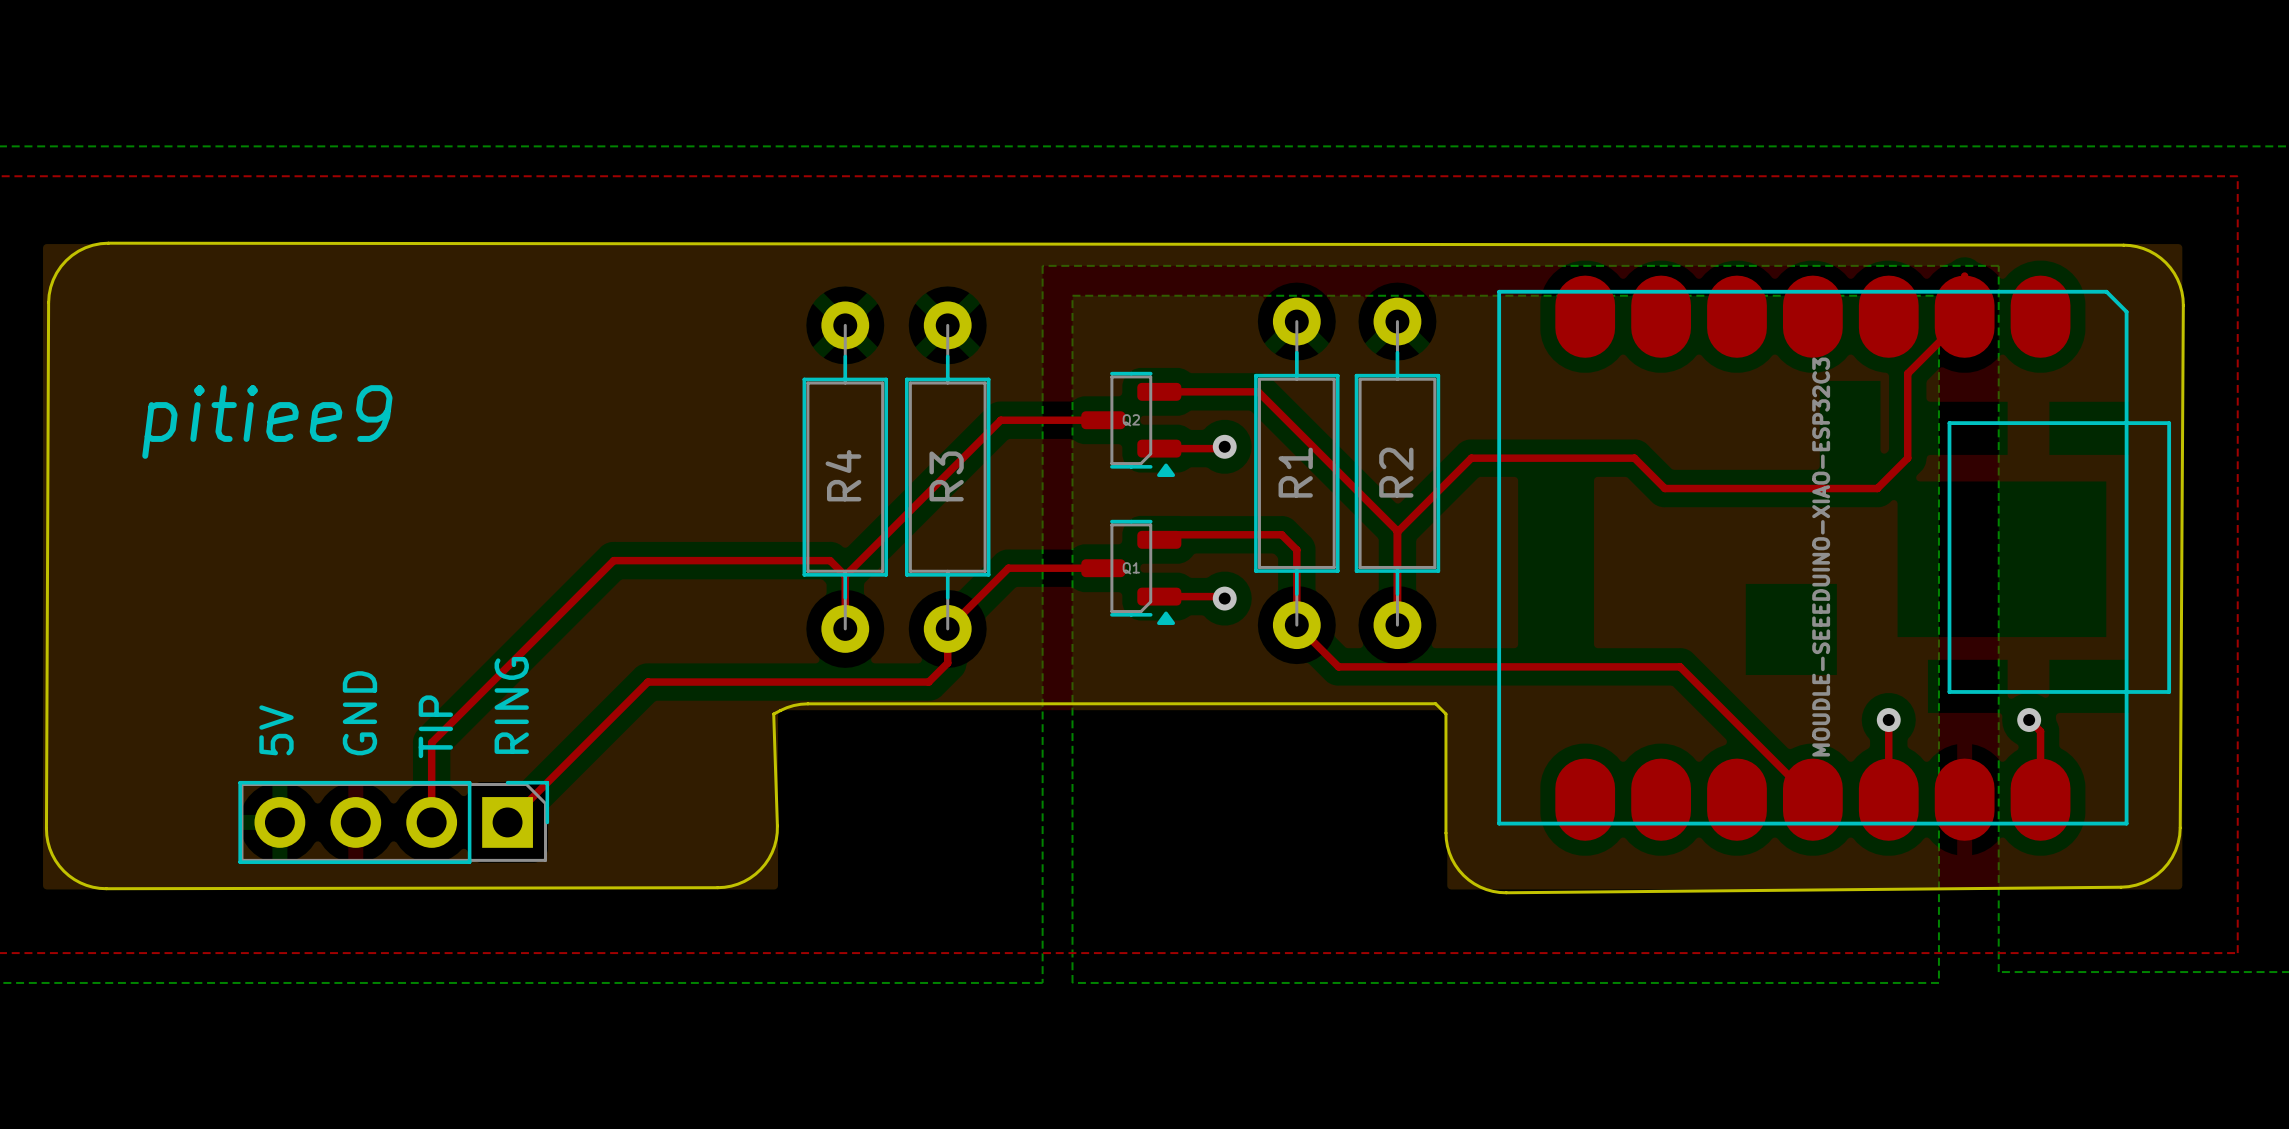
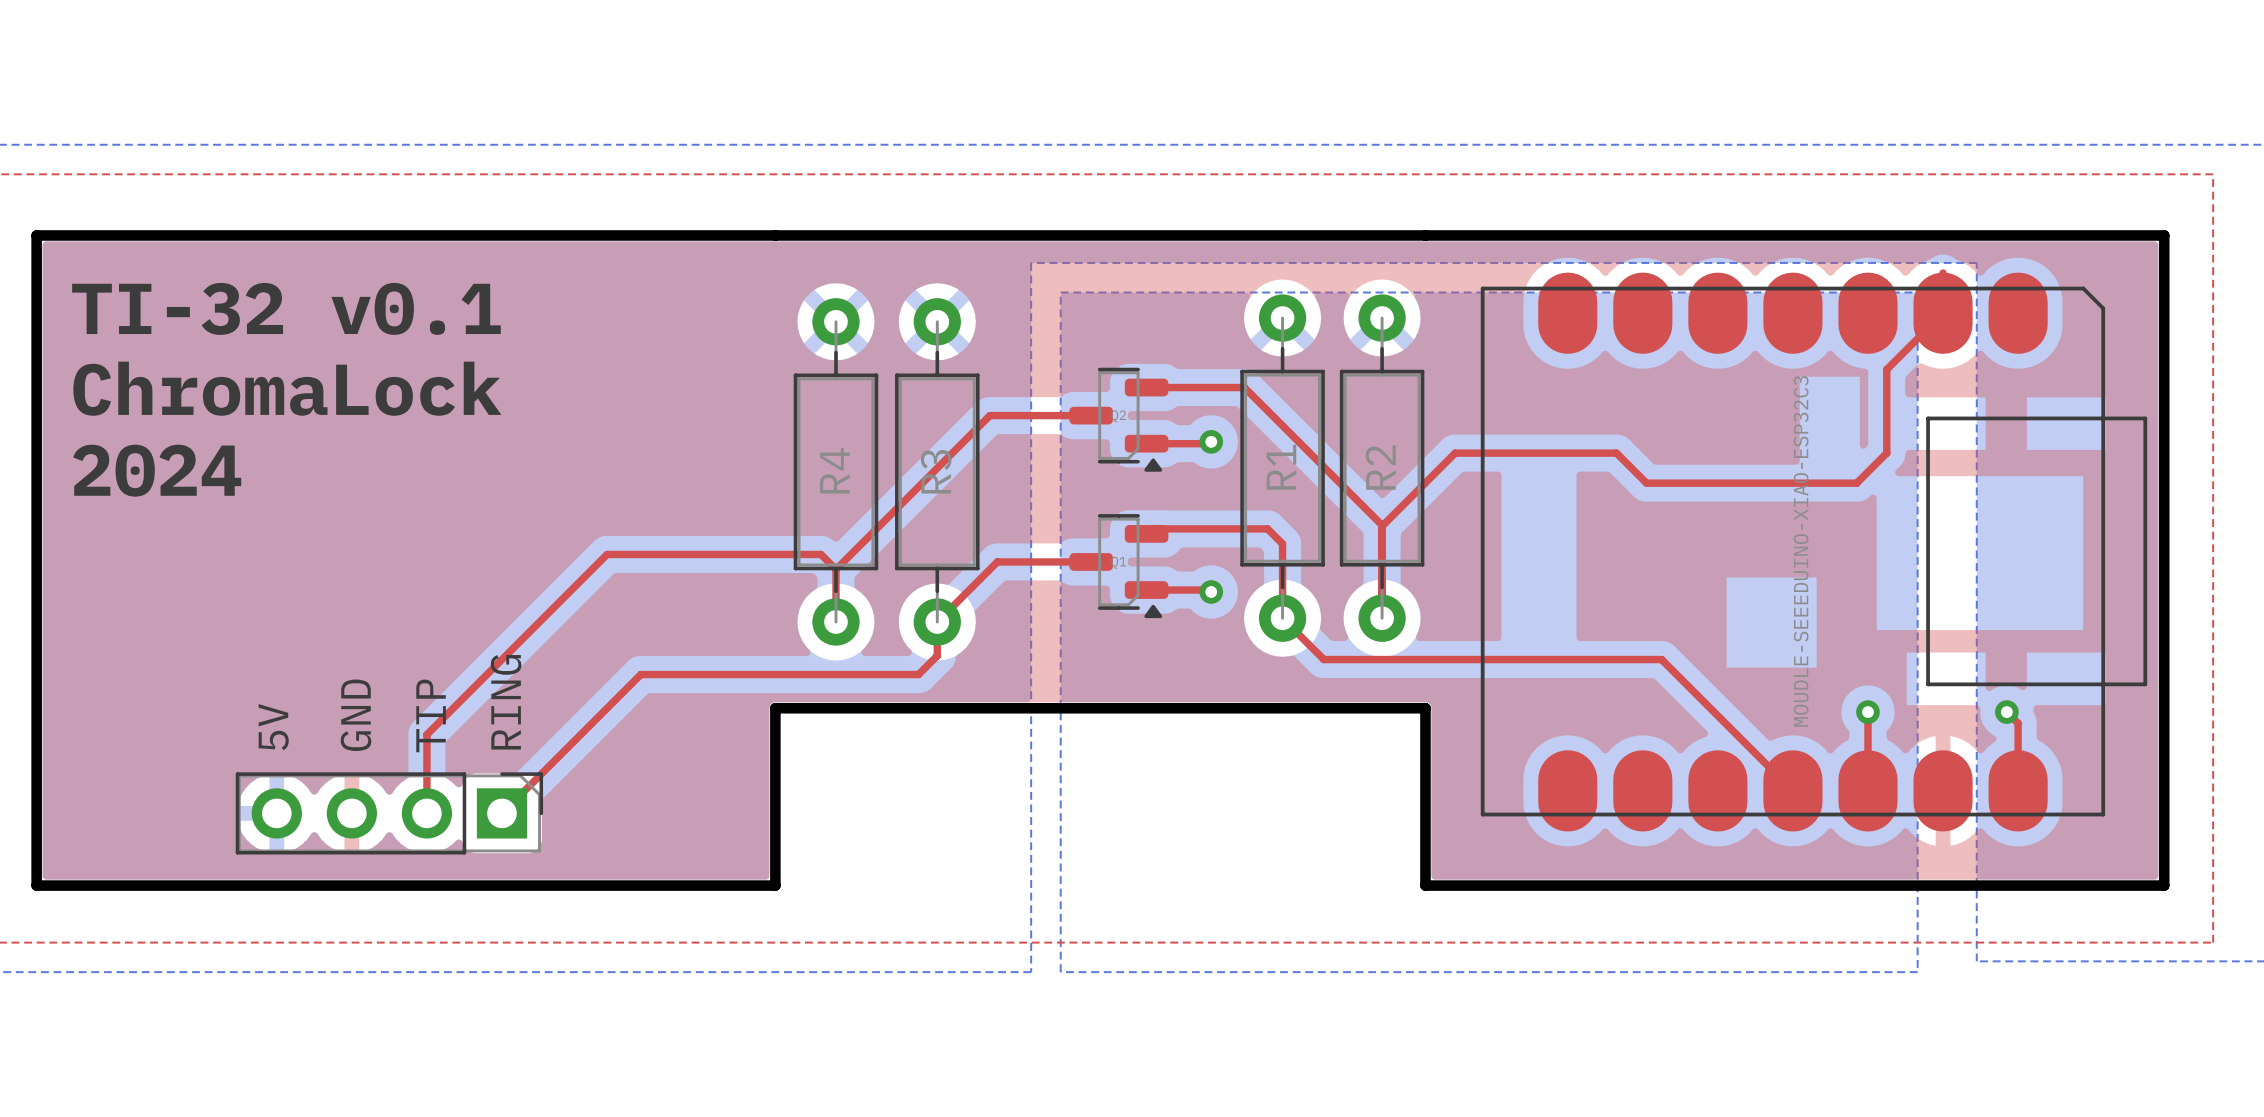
board edge: (108, 243) (2136, 246) (2155, 254) (2170, 267) (2180, 285) (2183, 298) (2180, 827) (2178, 843) (2172, 857) (2156, 874) (2136, 885) (2121, 887) (1499, 892) (1486, 889) (1468, 879) (1455, 864) (1449, 852) (1445, 833) (1445, 714) (1435, 703) (807, 703) (793, 705) (773, 714) (776, 839) (768, 858) (760, 869) (744, 881) (731, 886) (717, 887) (106, 888) (86, 885) (74, 879) (59, 866) (52, 854) (46, 835) (48, 302) (53, 279) (66, 260) (85, 247) (108, 243) -> (36, 235) (36, 885) (775, 885) (775, 708) (1425, 708) (1425, 885) (2164, 885) (2164, 235) (36, 235)
text: none -> TI-32 v0.1 (286, 308)
text: none -> ChromaLock (287, 388)
text: pitiee9 (267, 422) -> none
text: none -> 2024 (157, 470)

